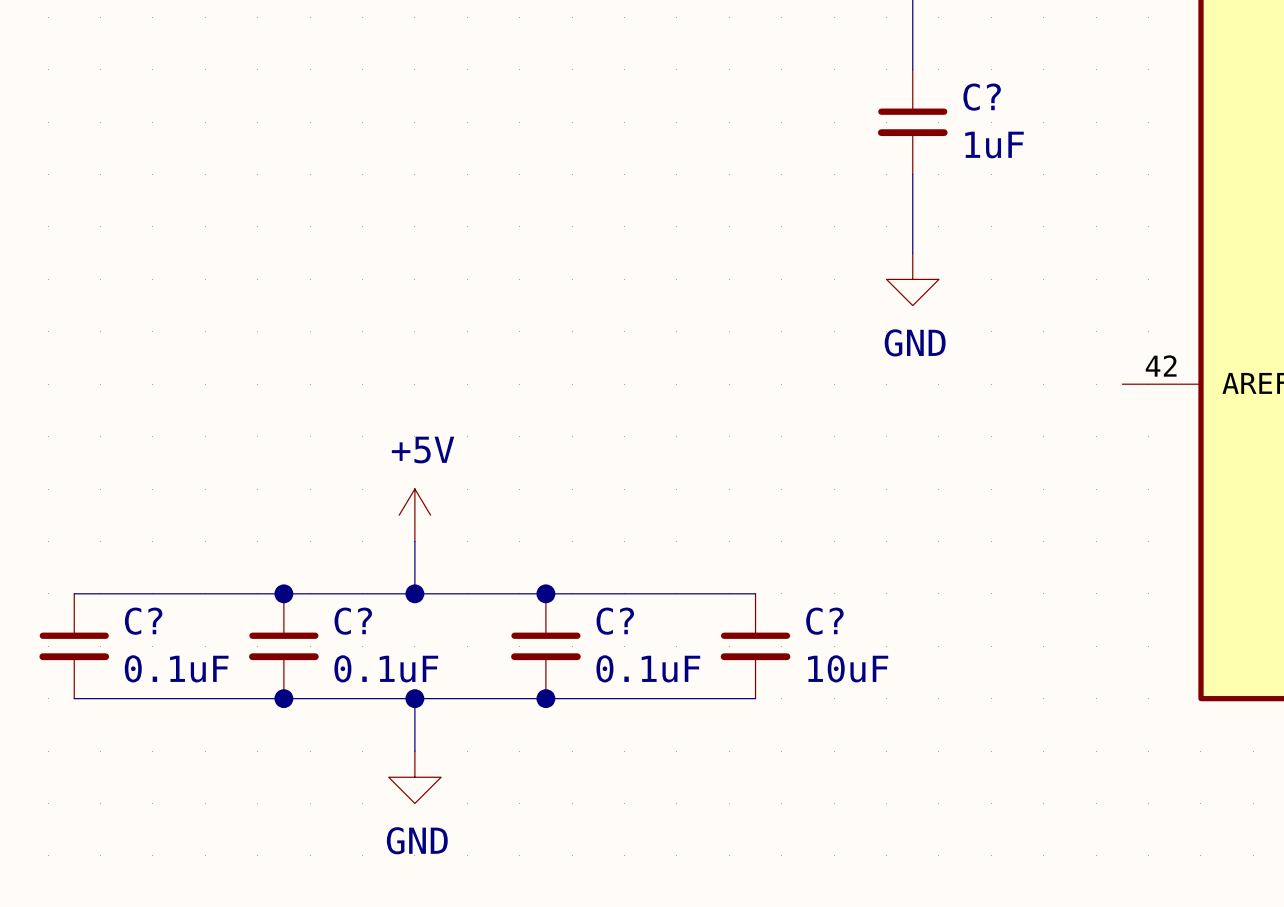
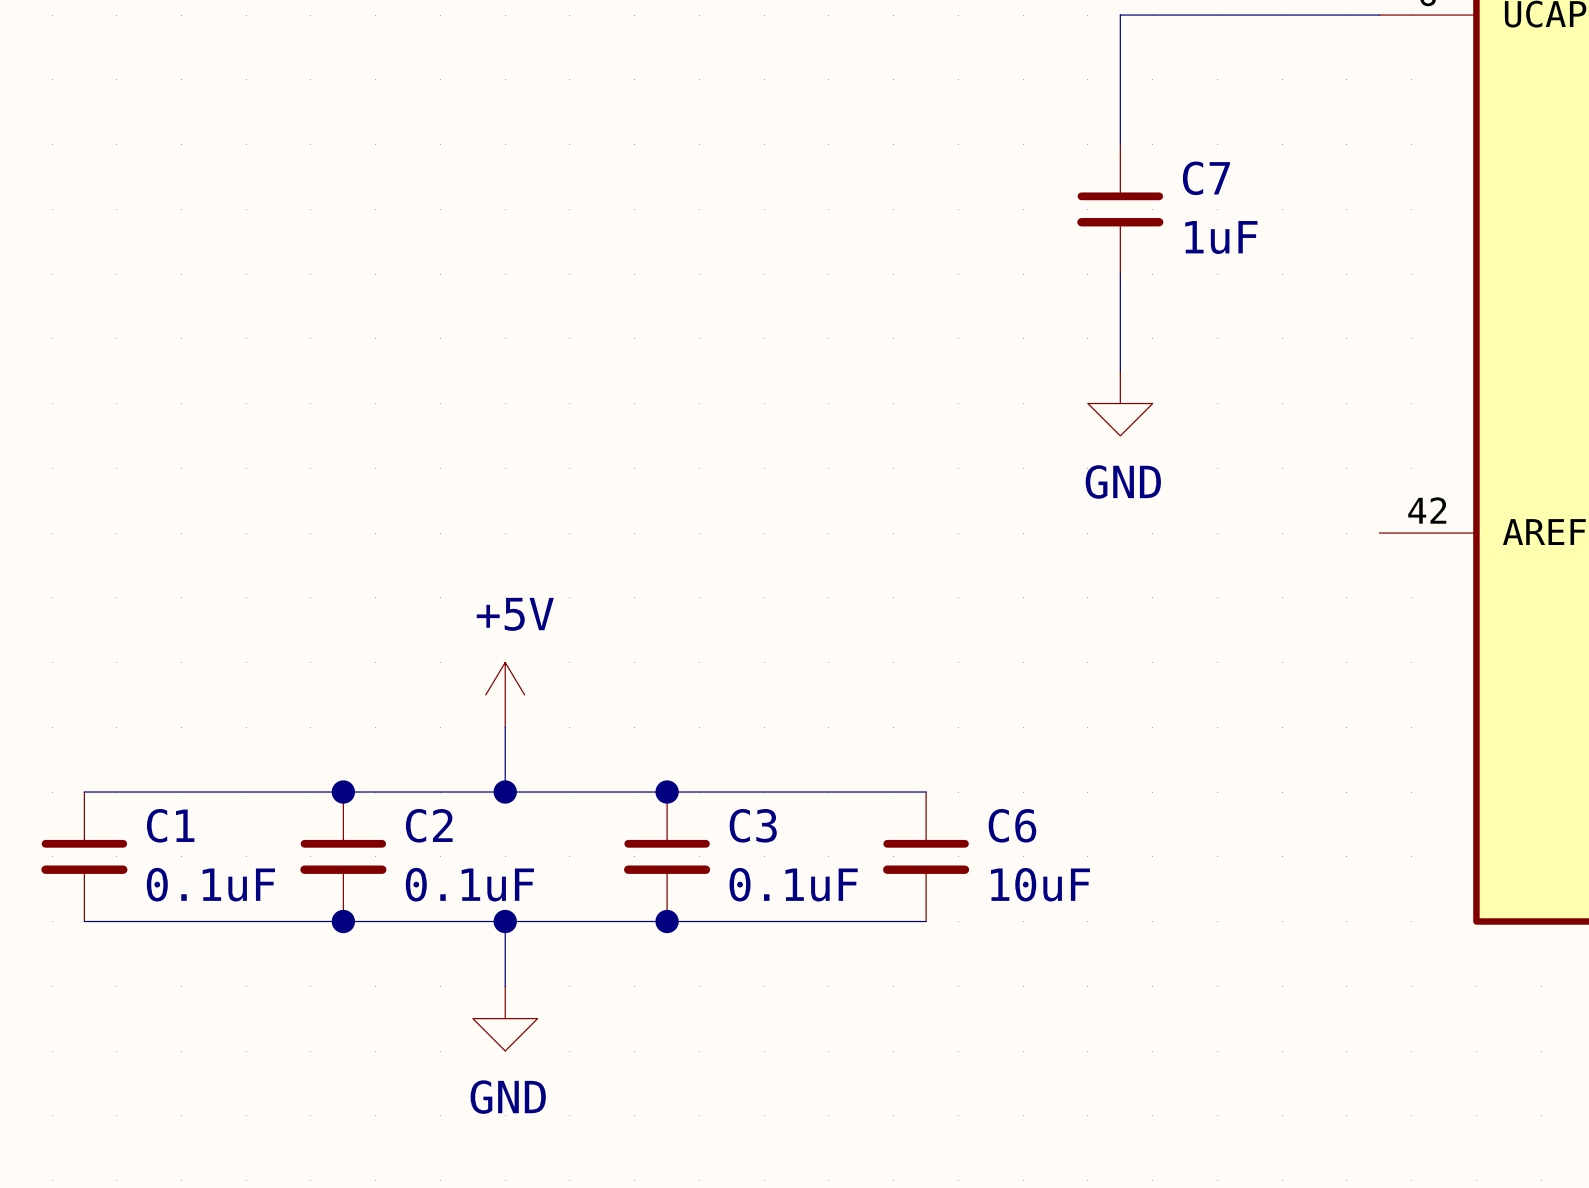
C? name: C? (982, 97) -> C7 (1206, 178)
C? name: C? (143, 621) -> C1 (170, 825)
C? name: C? (353, 621) -> C2 (429, 825)
C? name: C? (615, 621) -> C3 (753, 825)
C? name: C? (824, 621) -> C6 (1012, 825)

